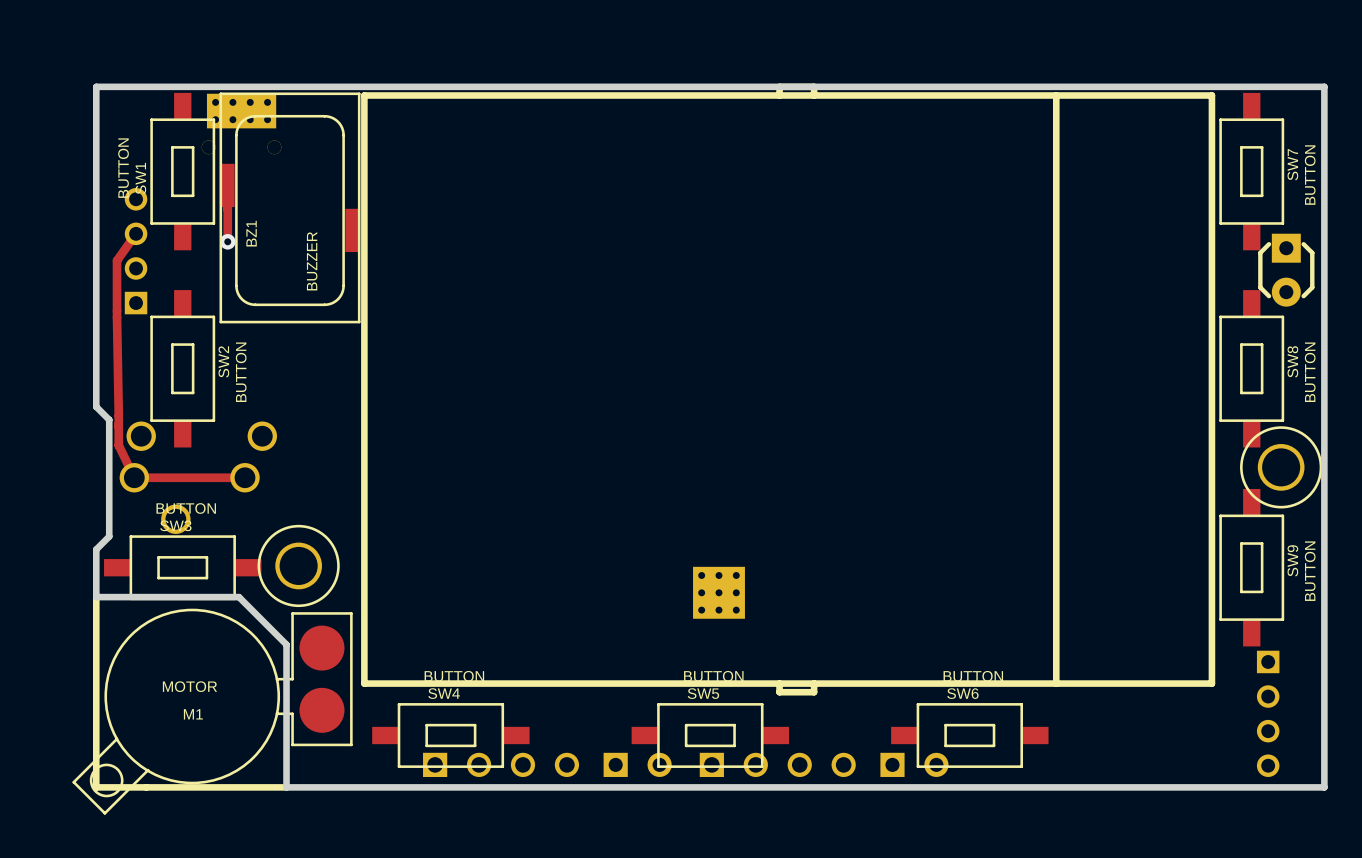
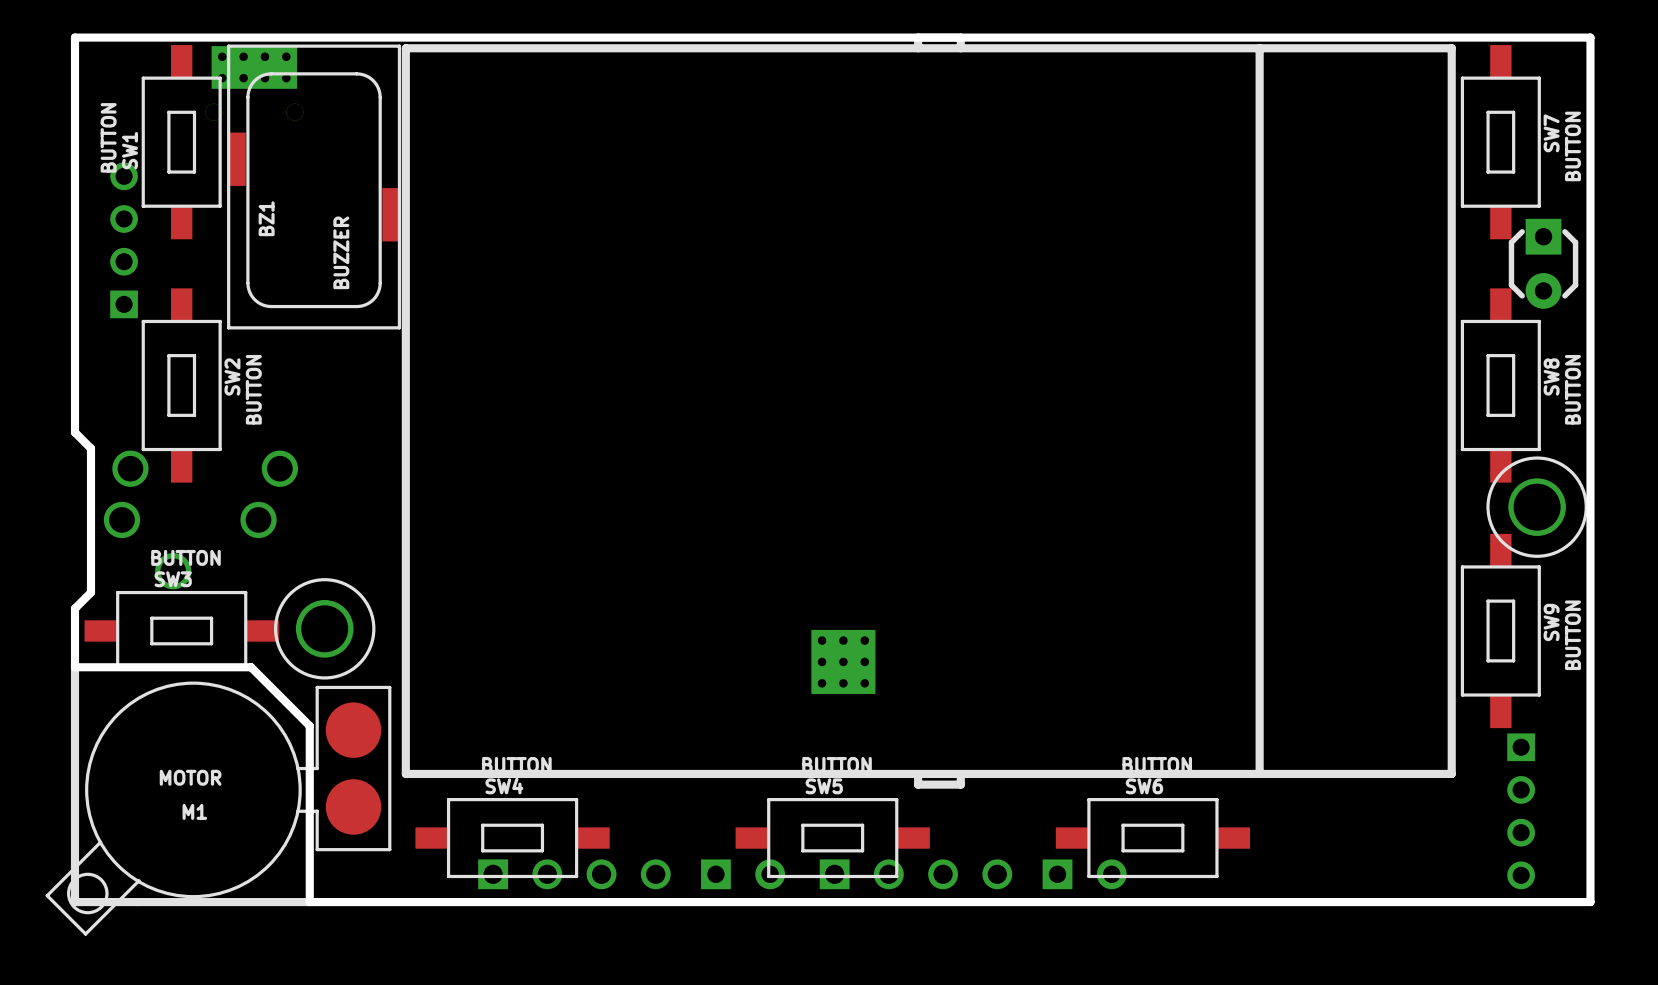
track: (227, 185) (227, 241) -> none
track: (136, 233) (117, 260) (118, 445) -> none
via: (227, 241) -> none
track: (118, 445) (134, 477) (245, 477) -> none

